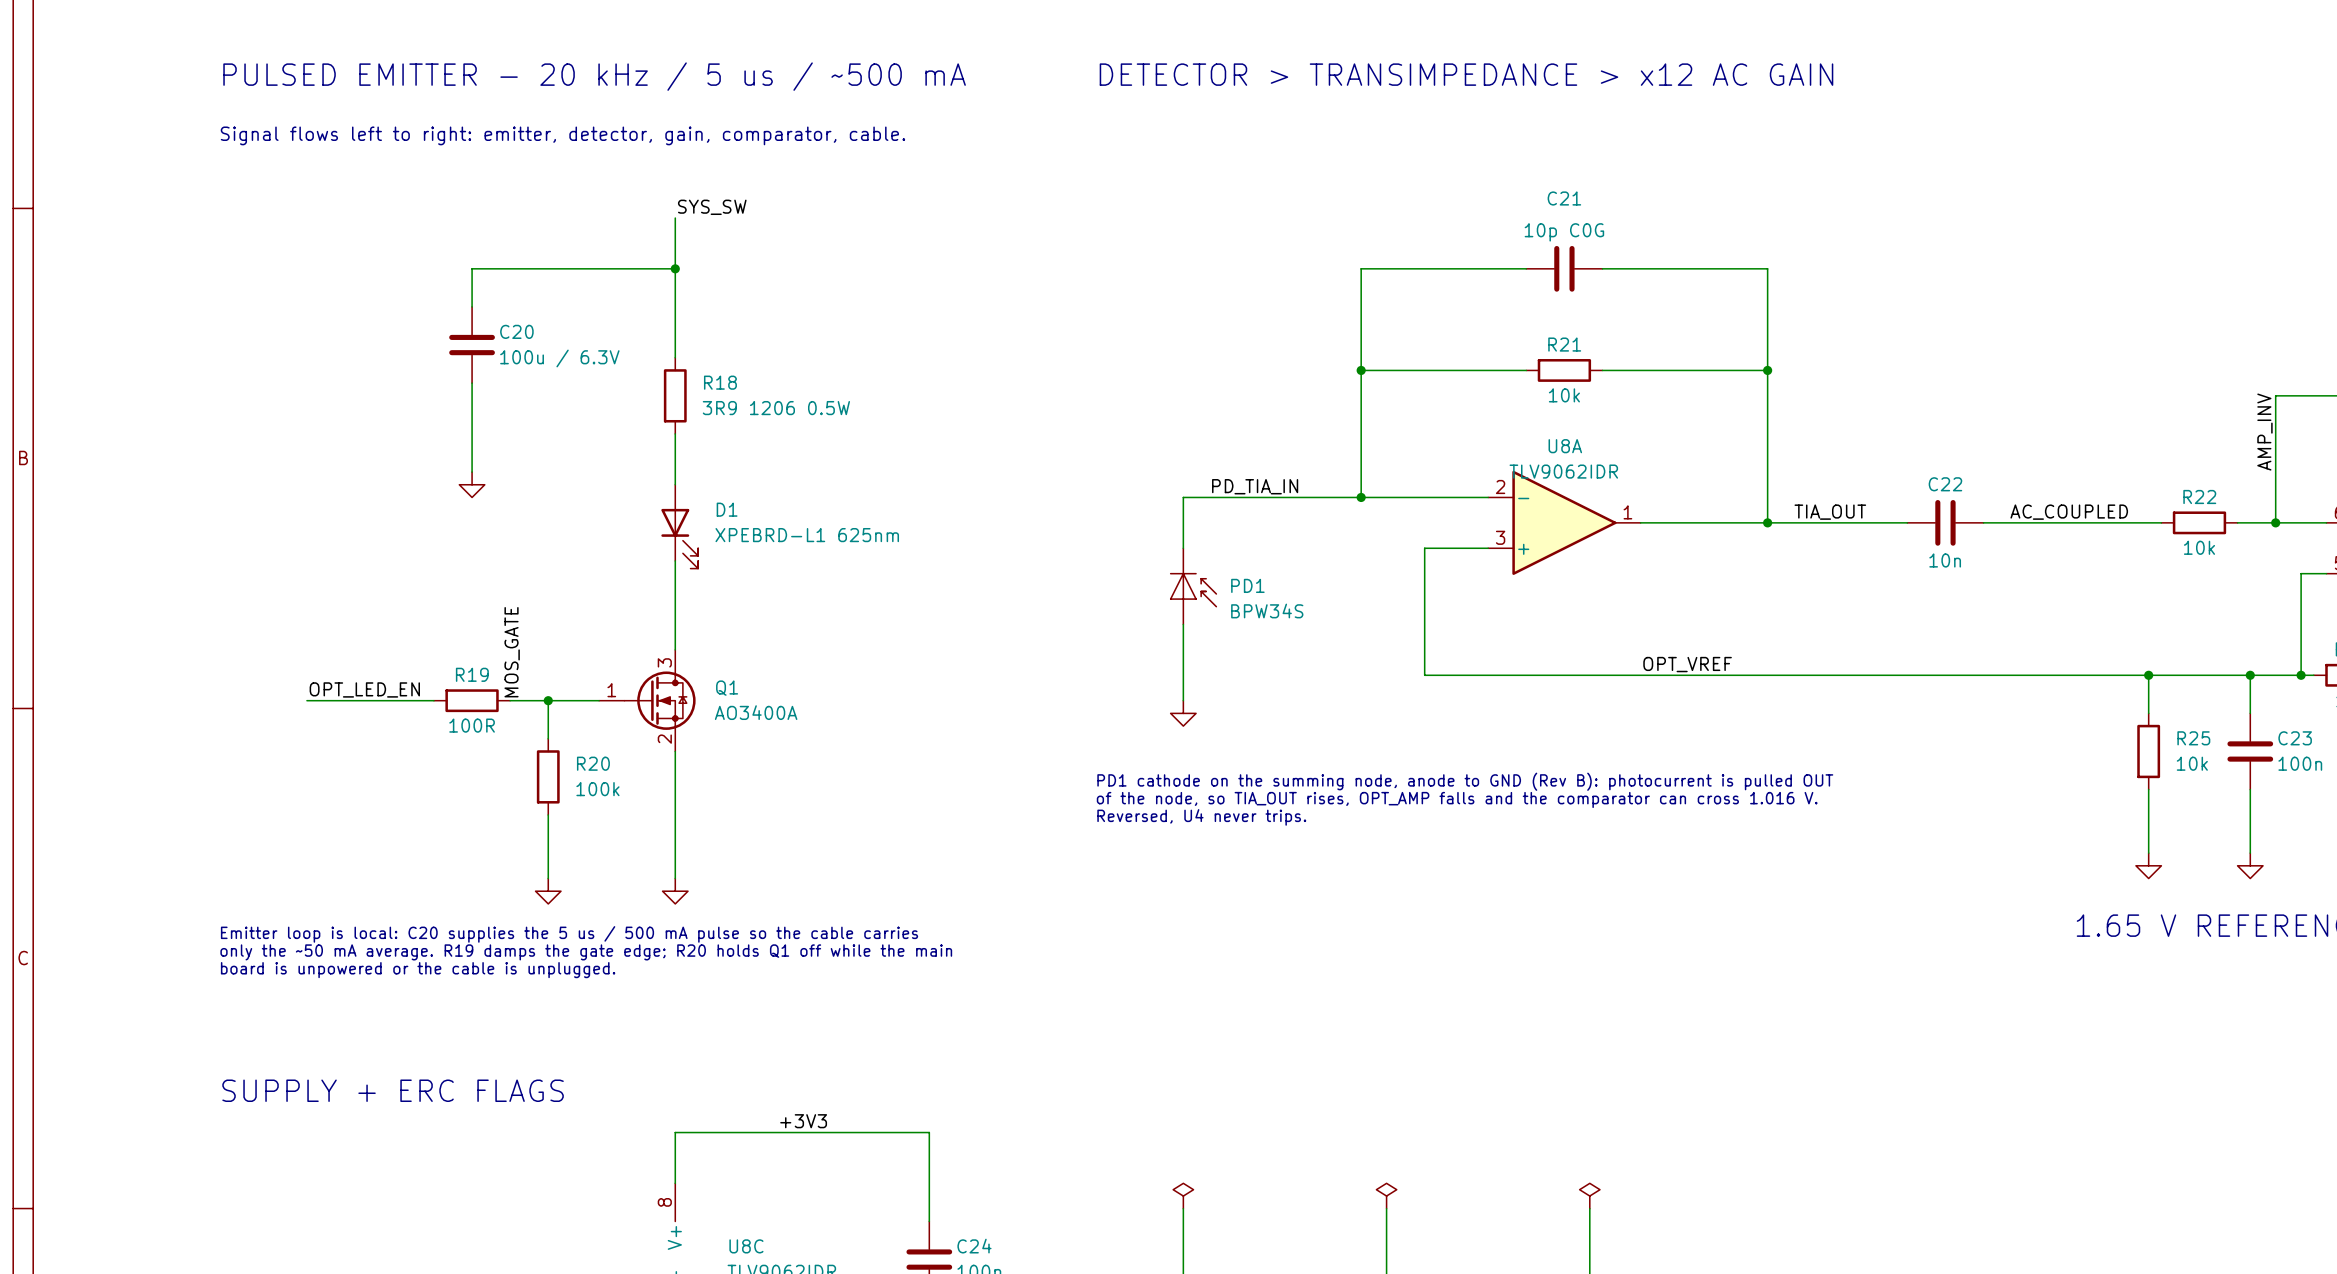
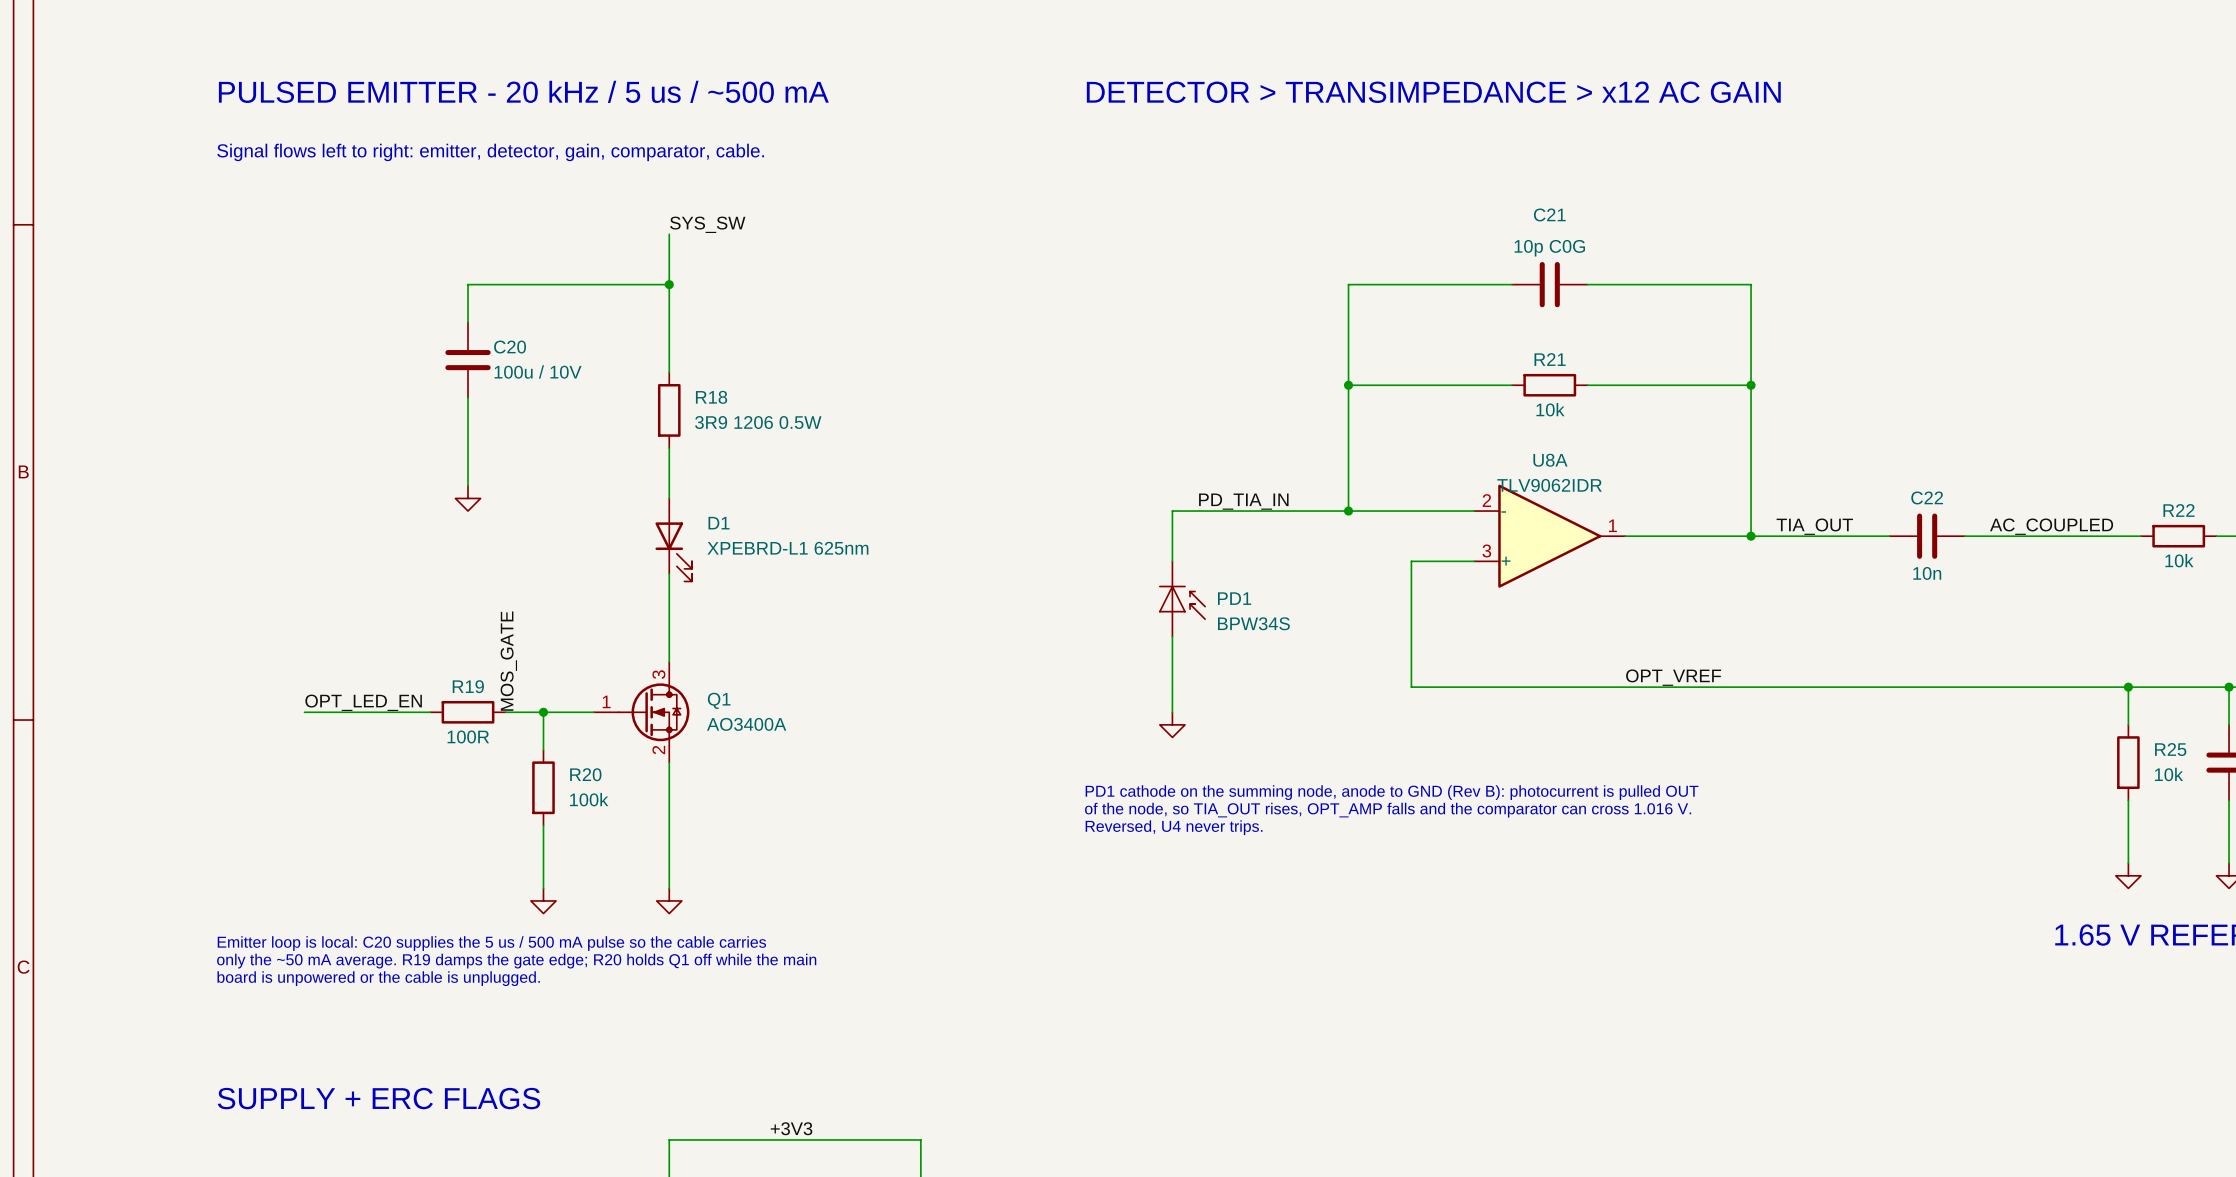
C20 value: 100u / 6.3V (559, 358) -> 100u / 10V (538, 371)

